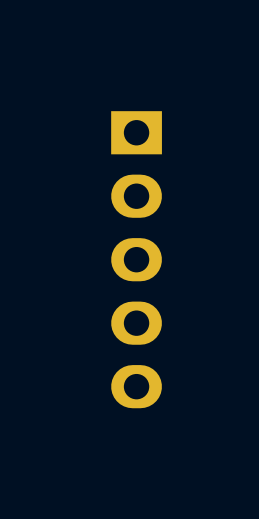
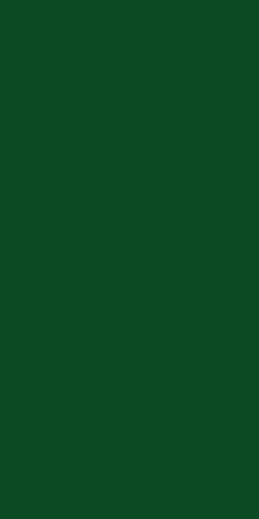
part: (136, 259) -> none

